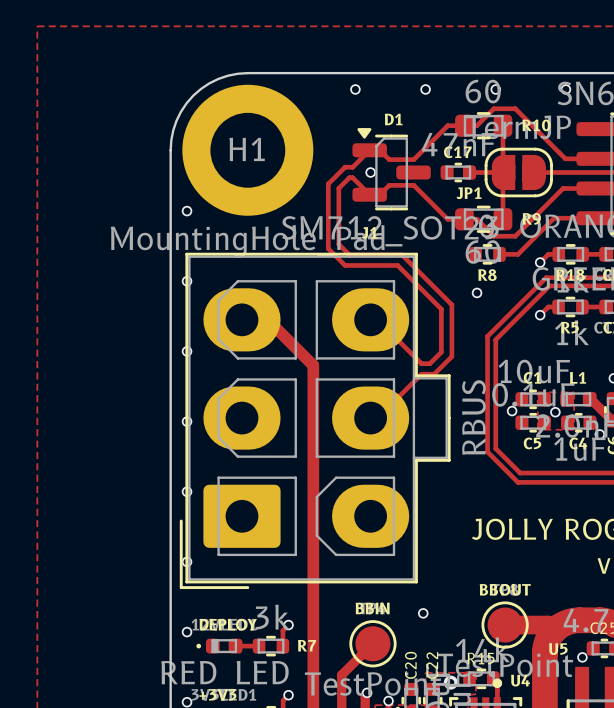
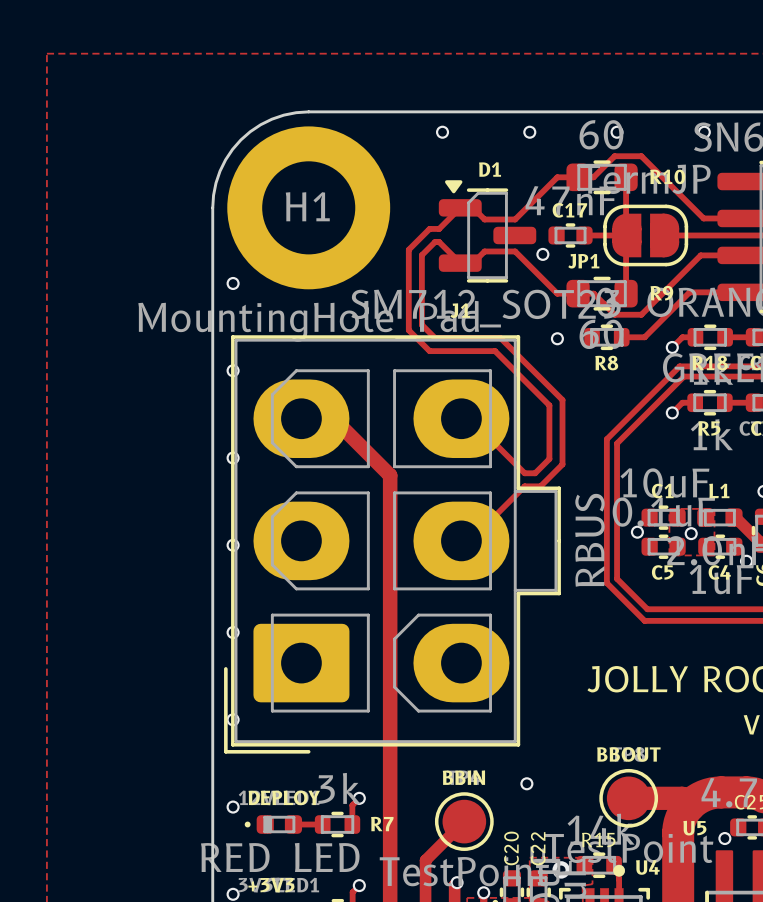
via: (370, 172) -> none
via: none -> (542, 254)
via position: (477, 292) -> (557, 338)

